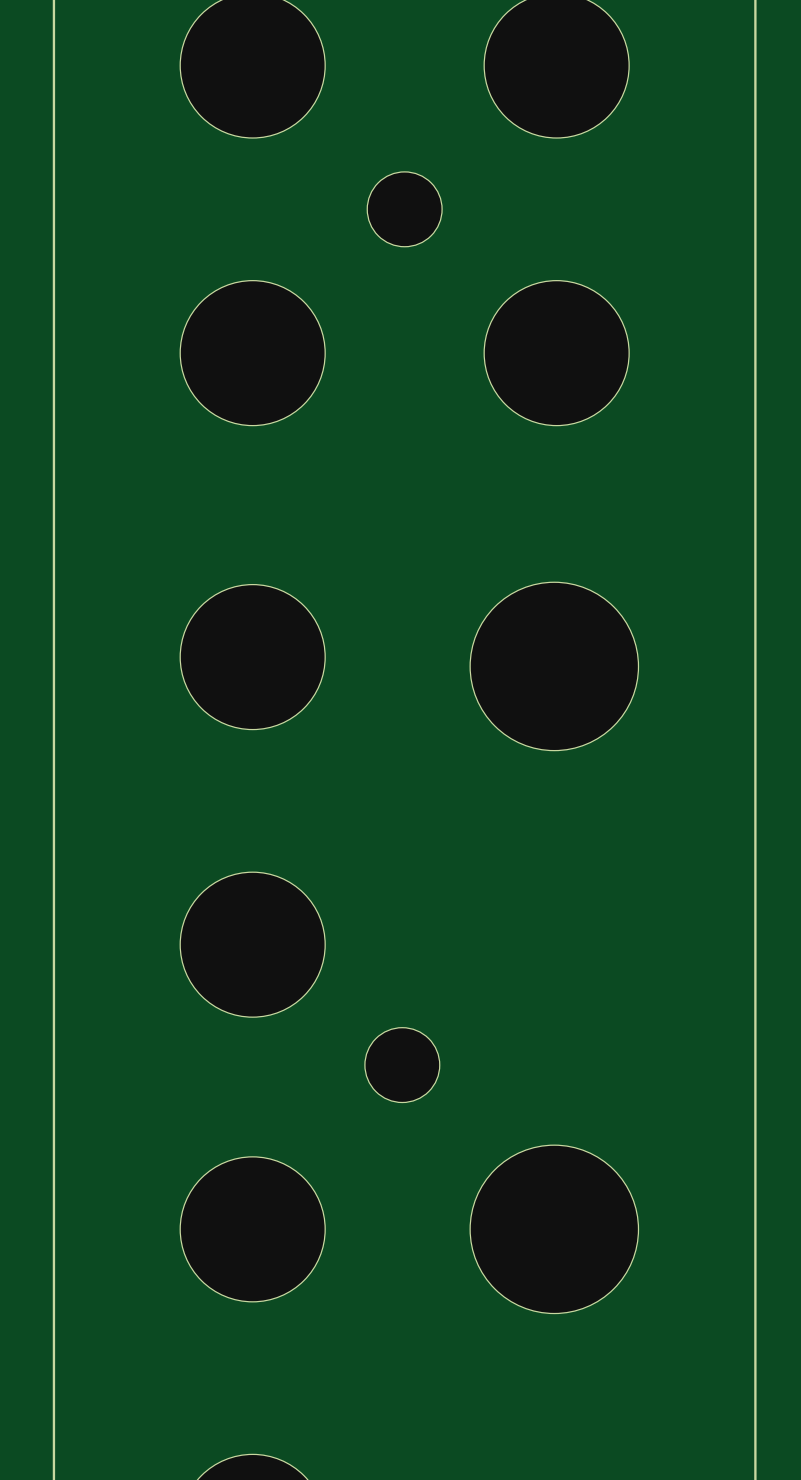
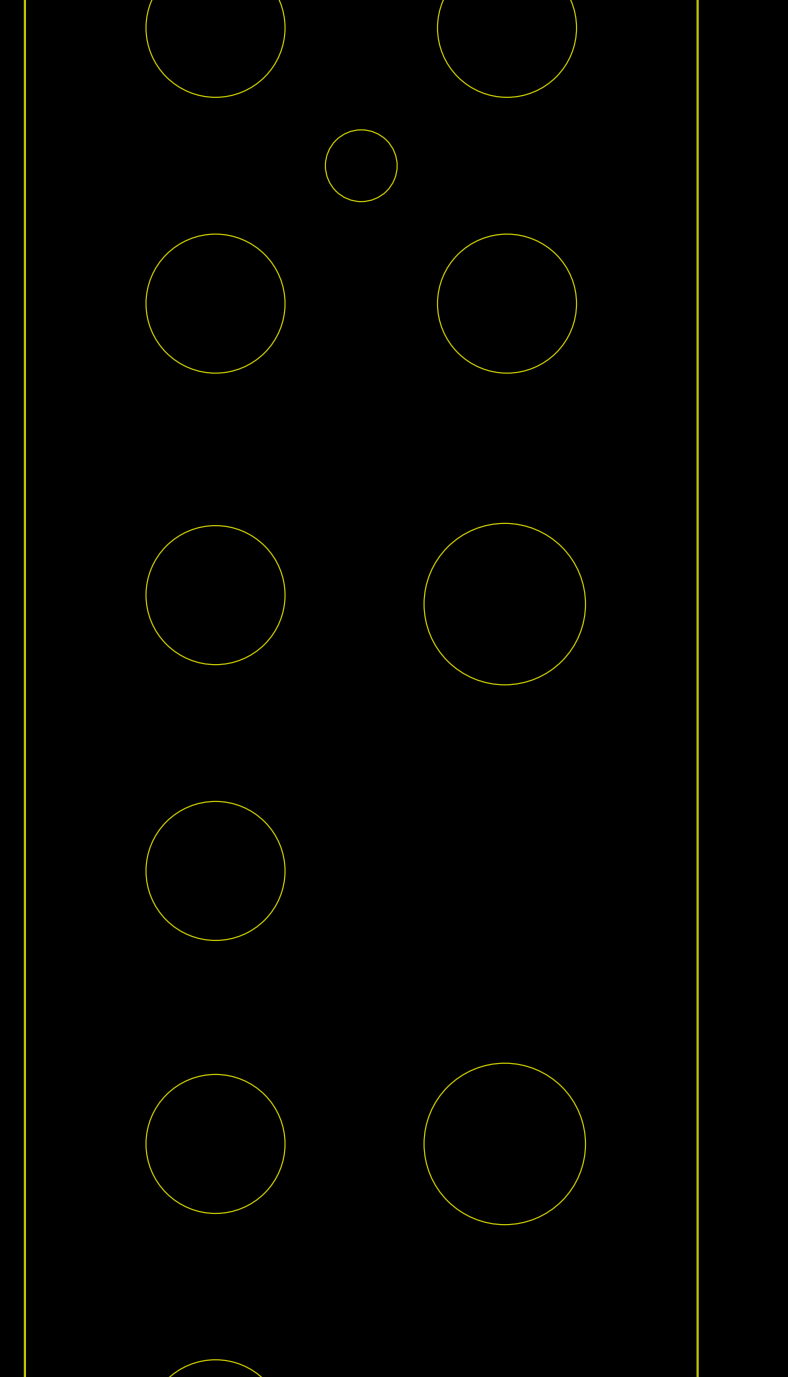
part: (402, 1065) -> none

